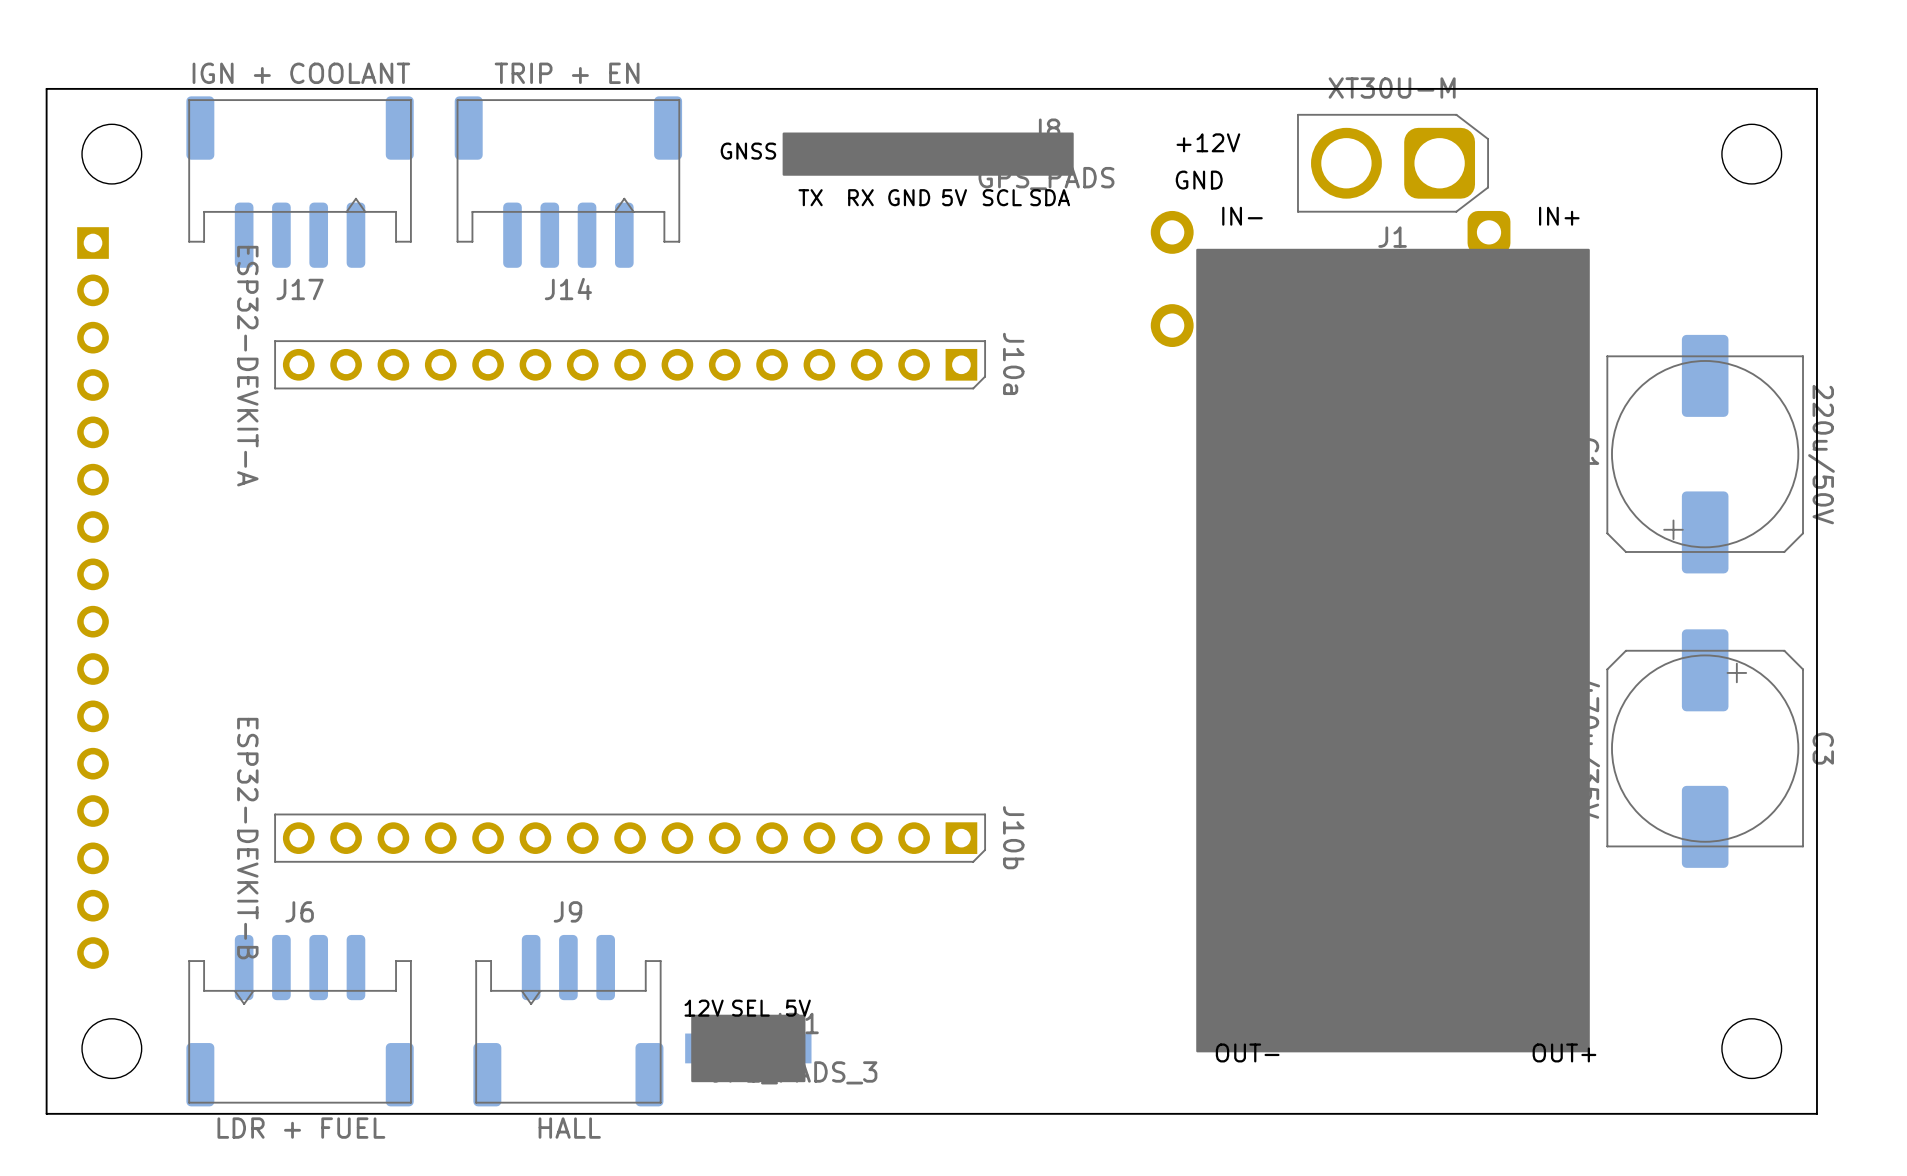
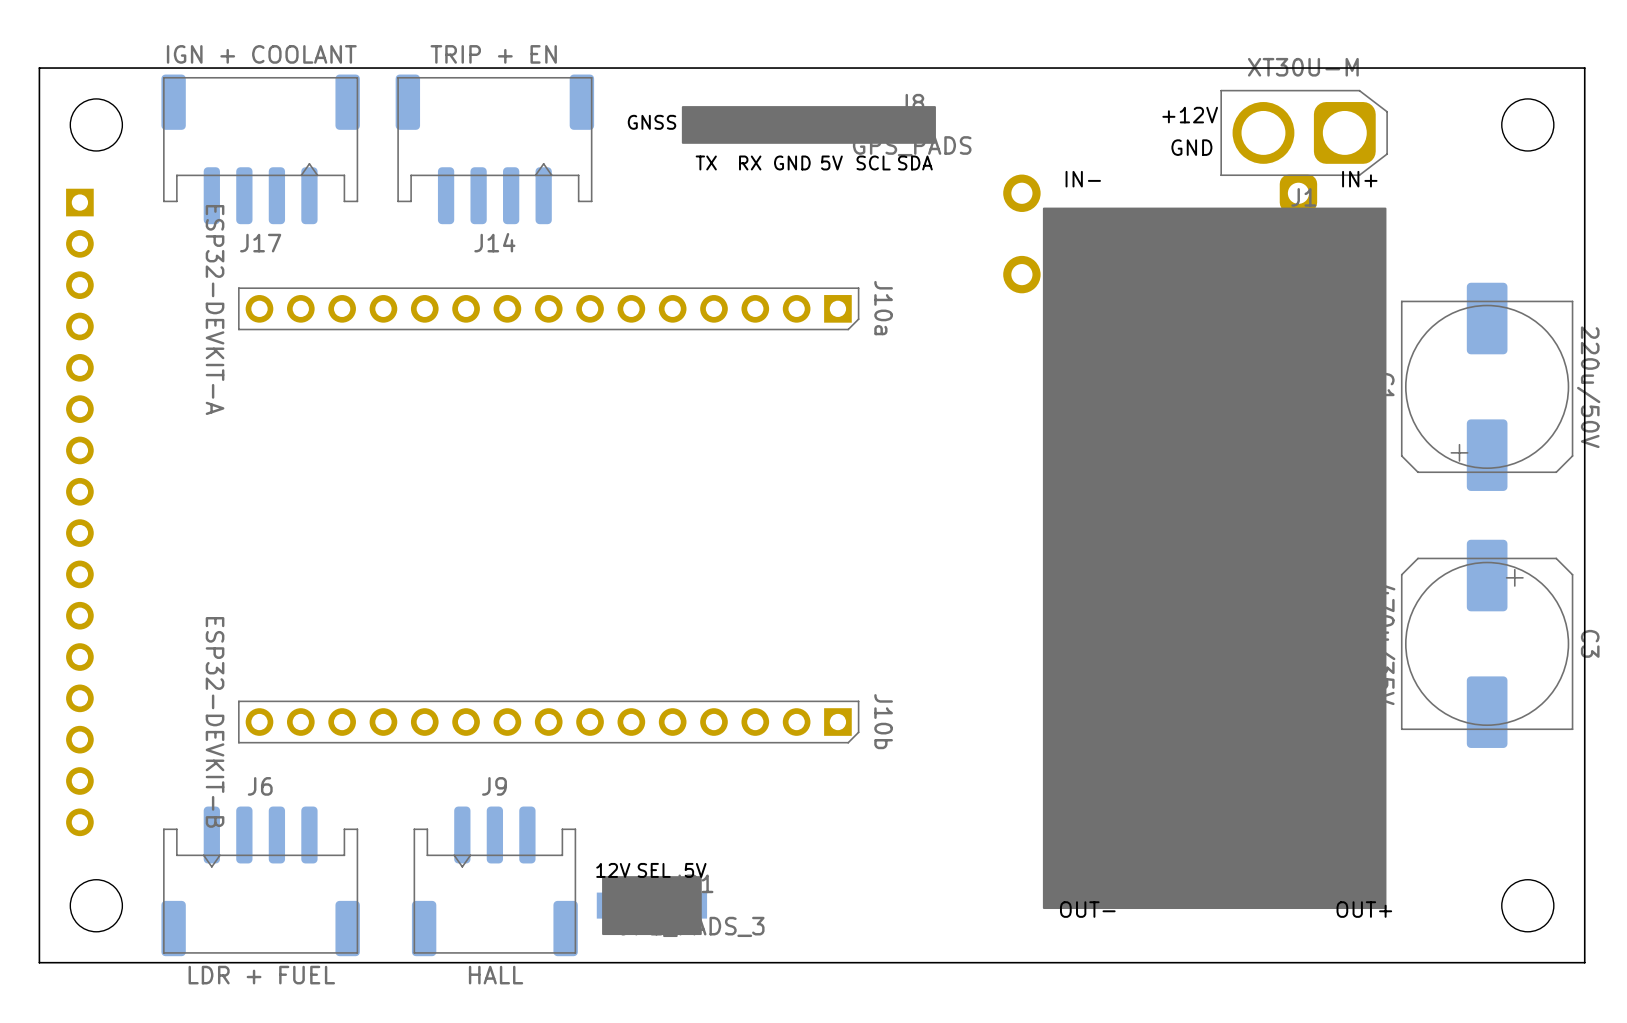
text position: +12V (1208, 142) -> +12V (1190, 115)
J1 position: (1393, 163) -> (1304, 132)
text position: GND (1199, 180) -> GND (1191, 147)
part footprint: [1196, 248, 1590, 1053] -> [1042, 207, 1387, 910]

